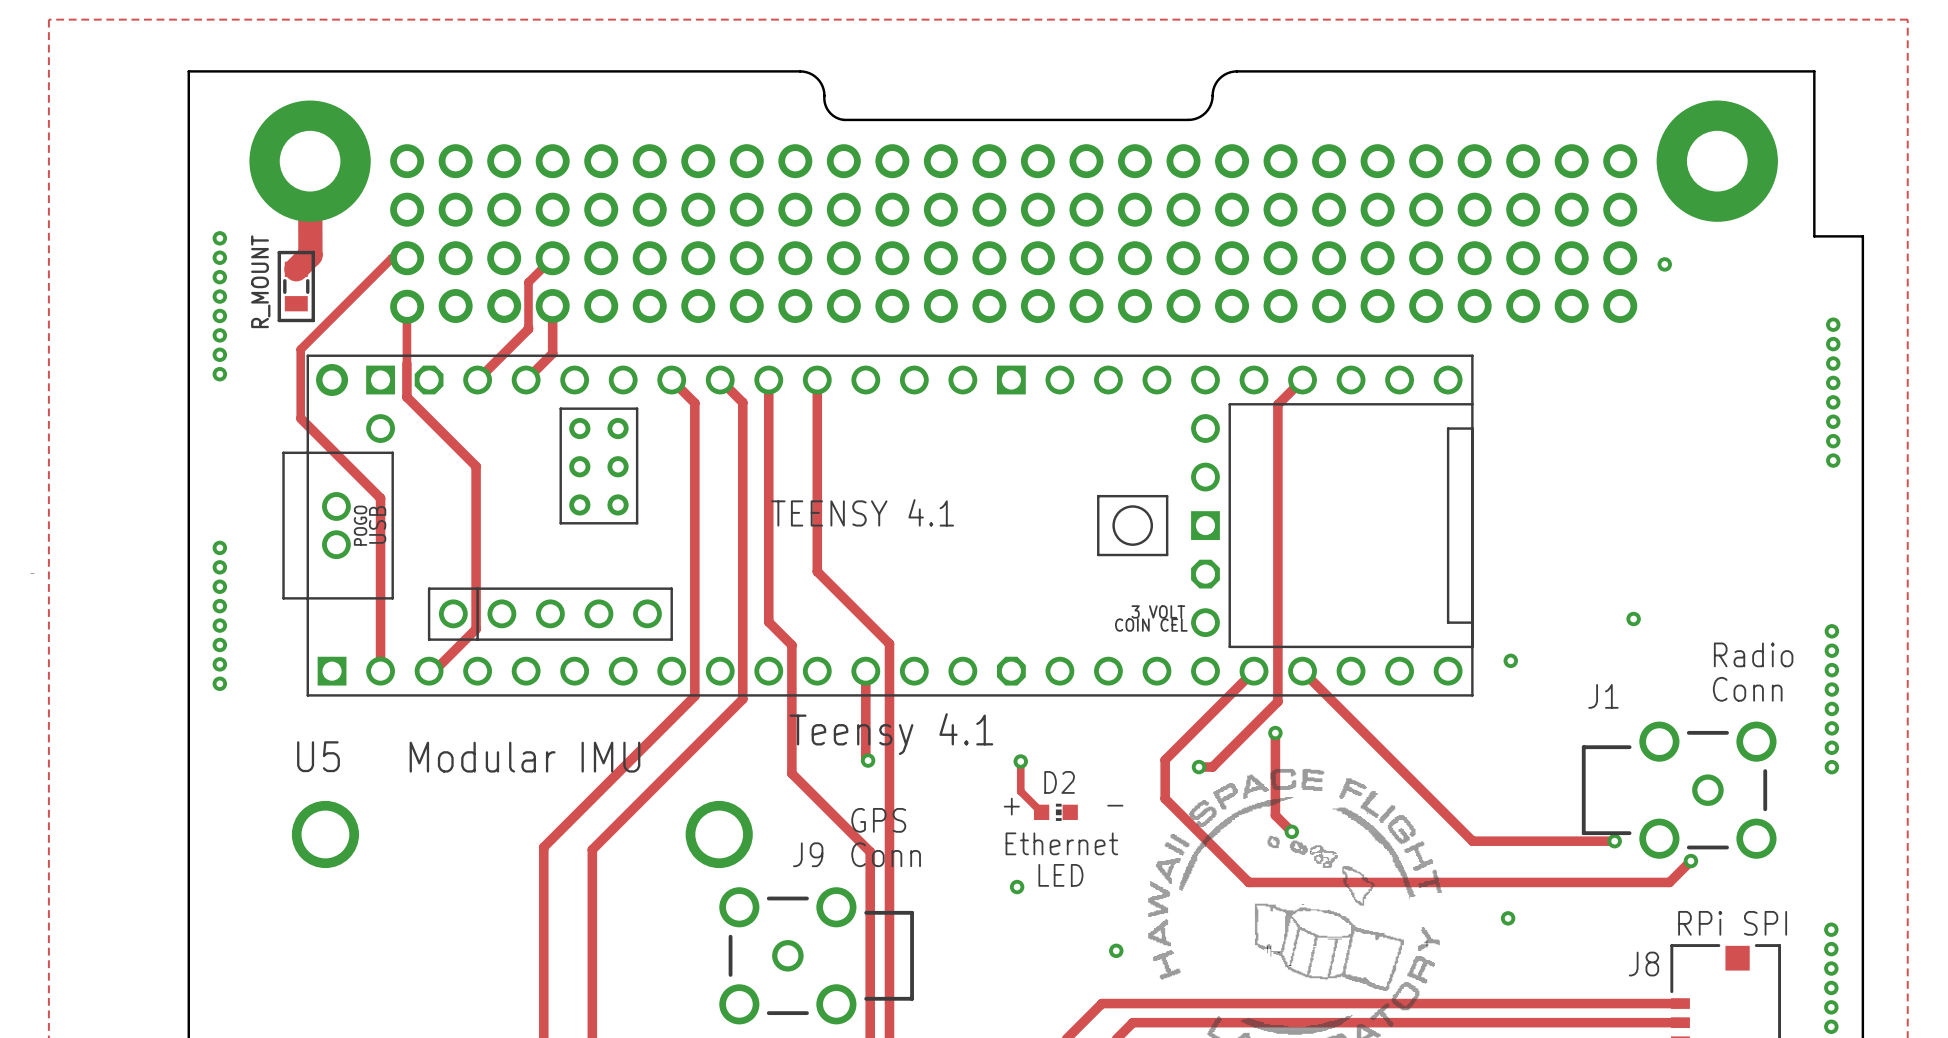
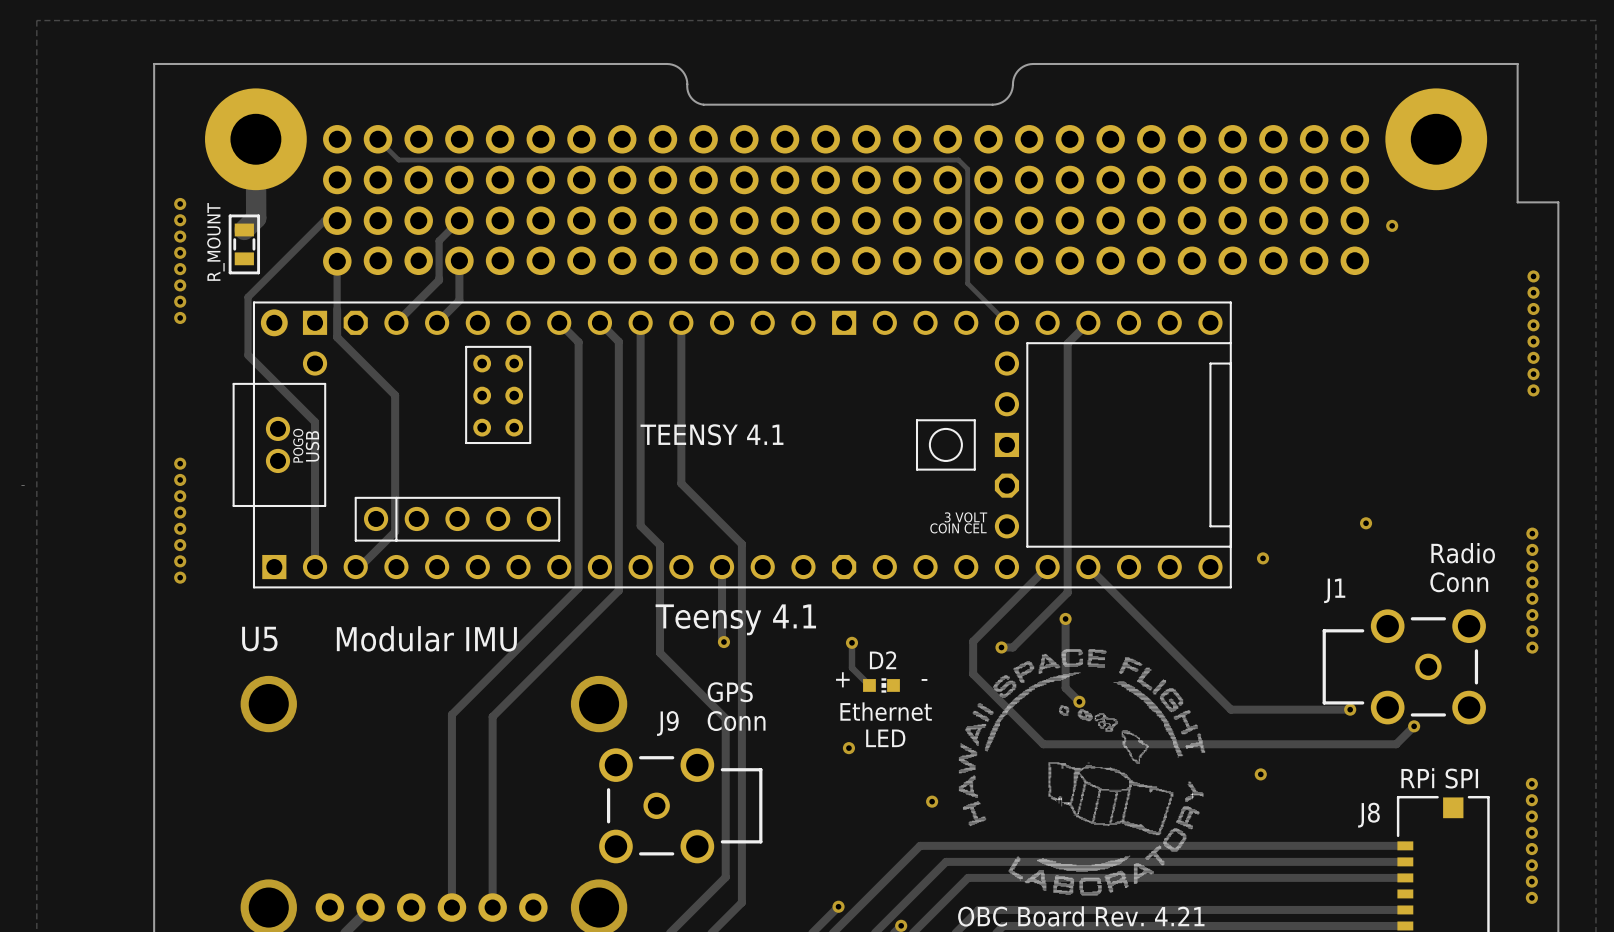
track: none -> (378, 139) (398, 160) (958, 160) (967, 169) (967, 283) (1006, 322)

